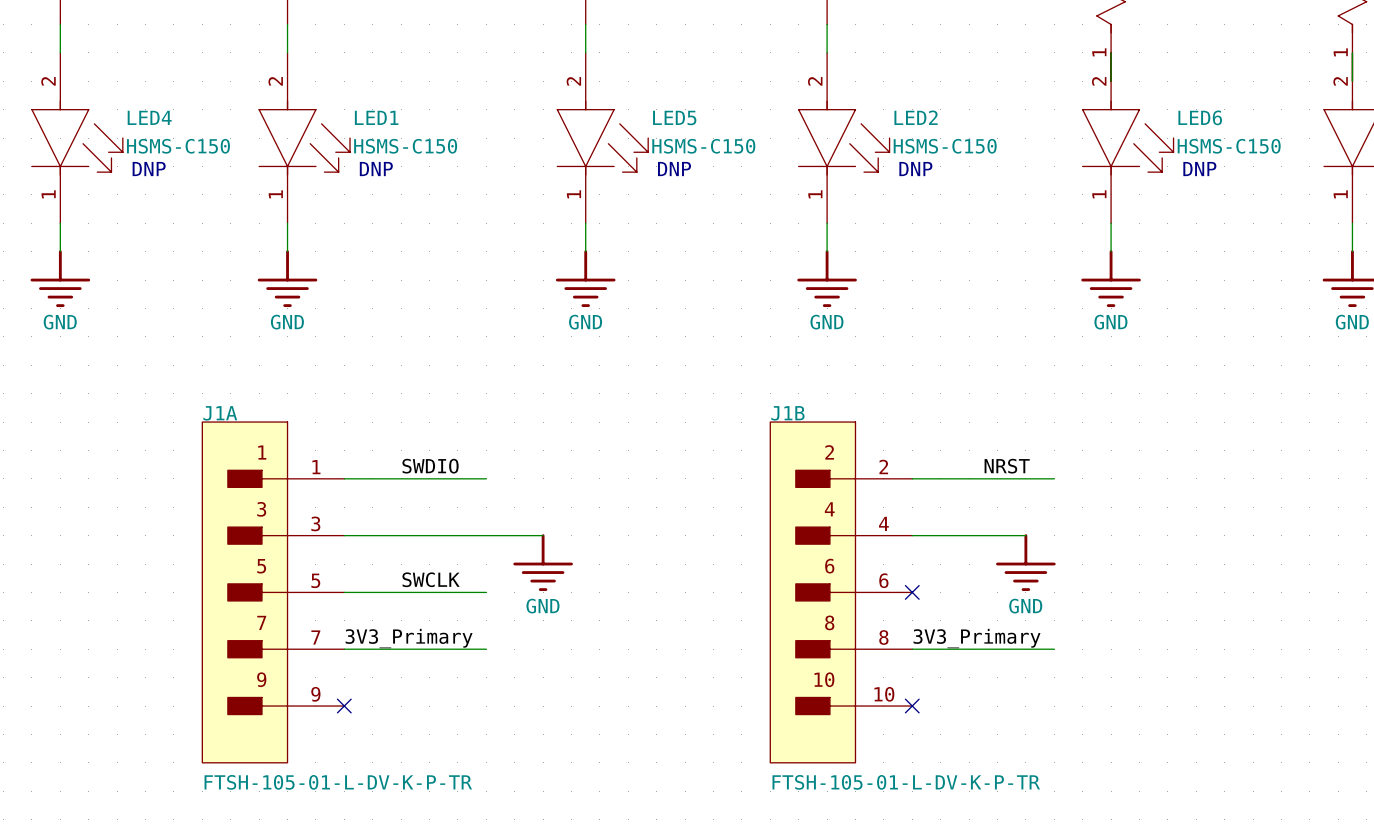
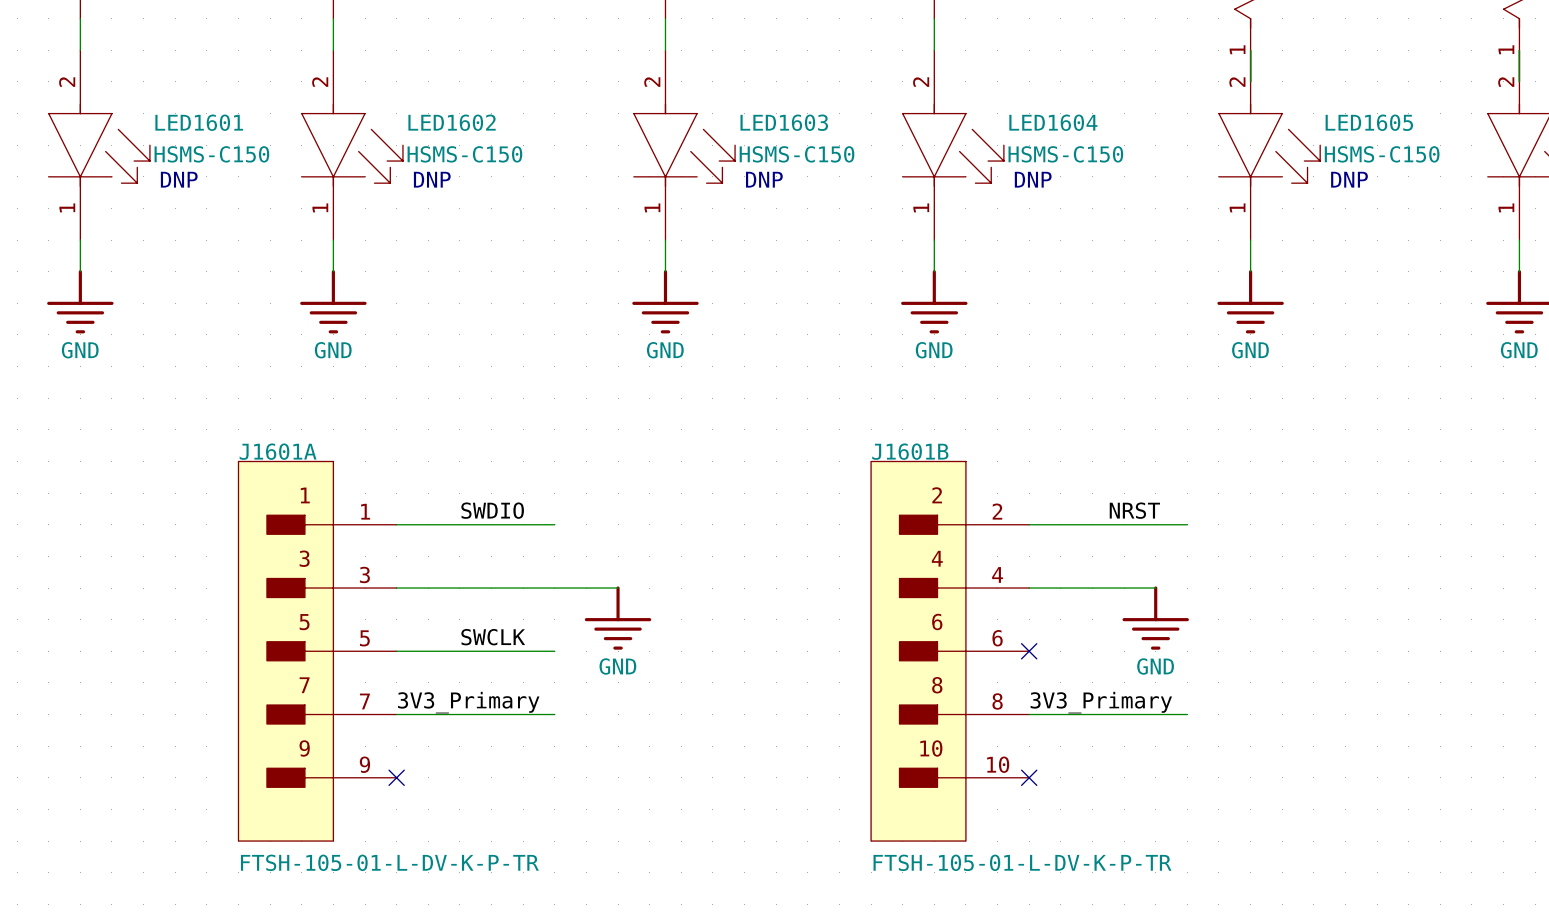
LED4 name: LED4 (149, 117) -> LED1601 (199, 122)
LED1 name: LED1 (376, 117) -> LED1602 (452, 122)
LED2 name: LED2 (916, 117) -> LED1604 (1053, 122)
LED6 name: LED6 (1200, 117) -> LED1605 (1369, 122)
LED5 name: LED5 (674, 118) -> LED1603 (784, 122)
J1A name: J1A (220, 413) -> J1601A (278, 451)
J1B name: J1B (787, 413) -> J1601B (910, 451)

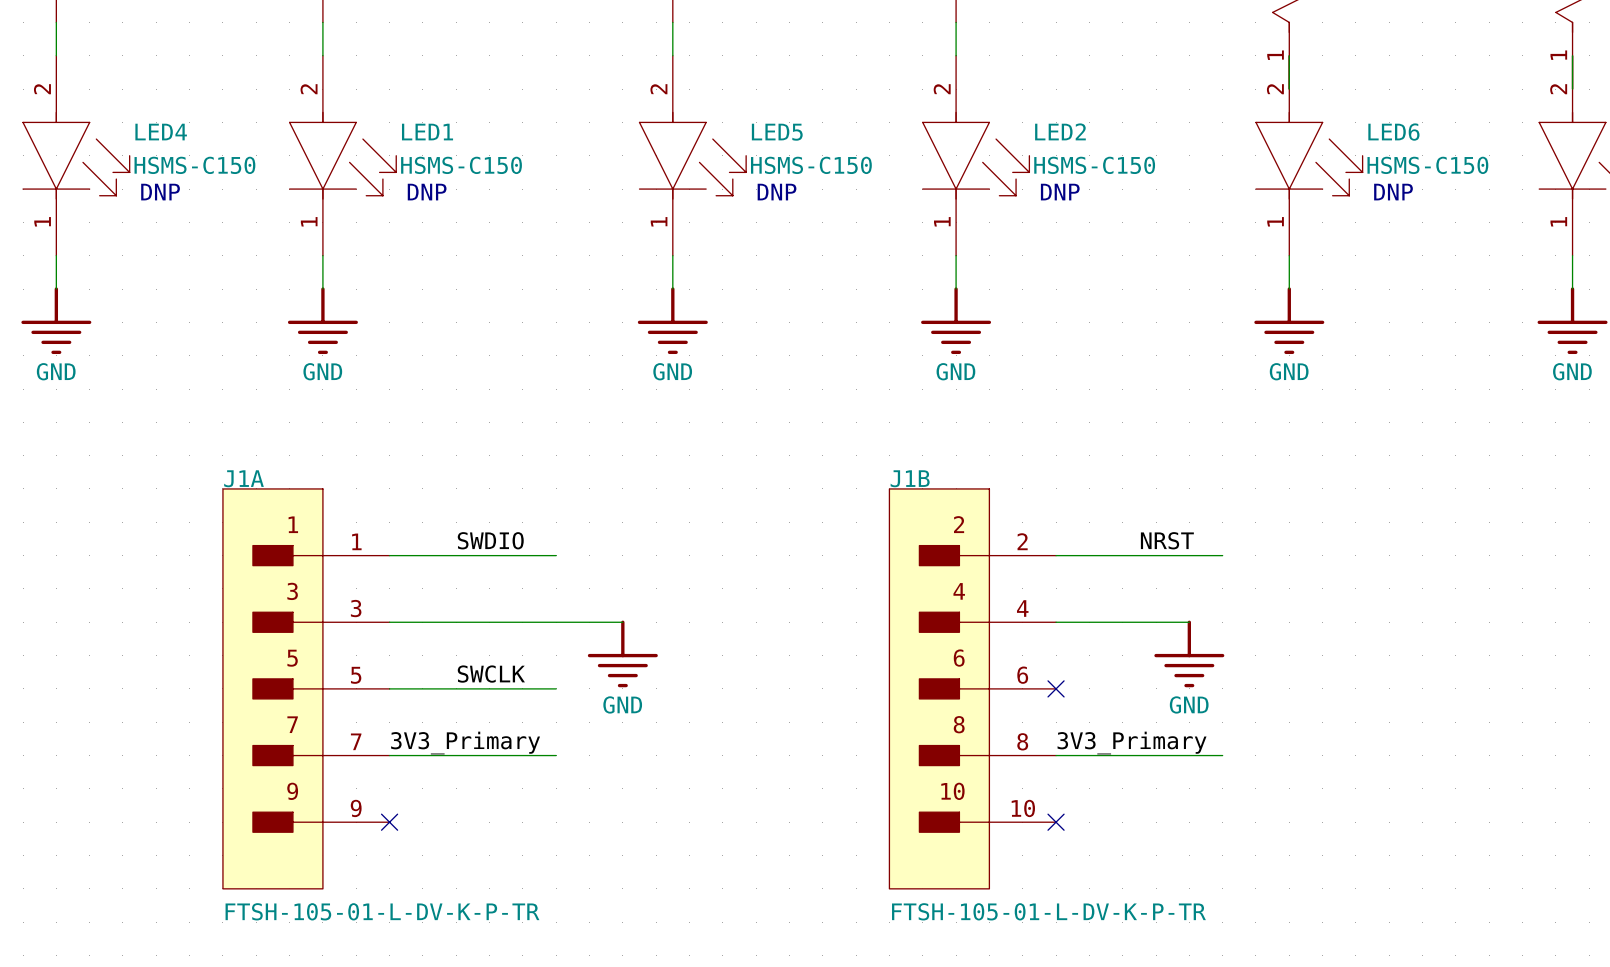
LED1601 name: LED1601 (199, 122) -> LED4 (161, 132)
LED1602 name: LED1602 (452, 122) -> LED1 (427, 132)
LED1603 name: LED1603 (784, 122) -> LED5 (777, 132)
LED1604 name: LED1604 (1053, 122) -> LED2 (1060, 131)
LED1605 name: LED1605 (1369, 122) -> LED6 (1393, 132)
J1601A name: J1601A (278, 451) -> J1A (244, 478)
J1601B name: J1601B (910, 451) -> J1B (910, 478)

